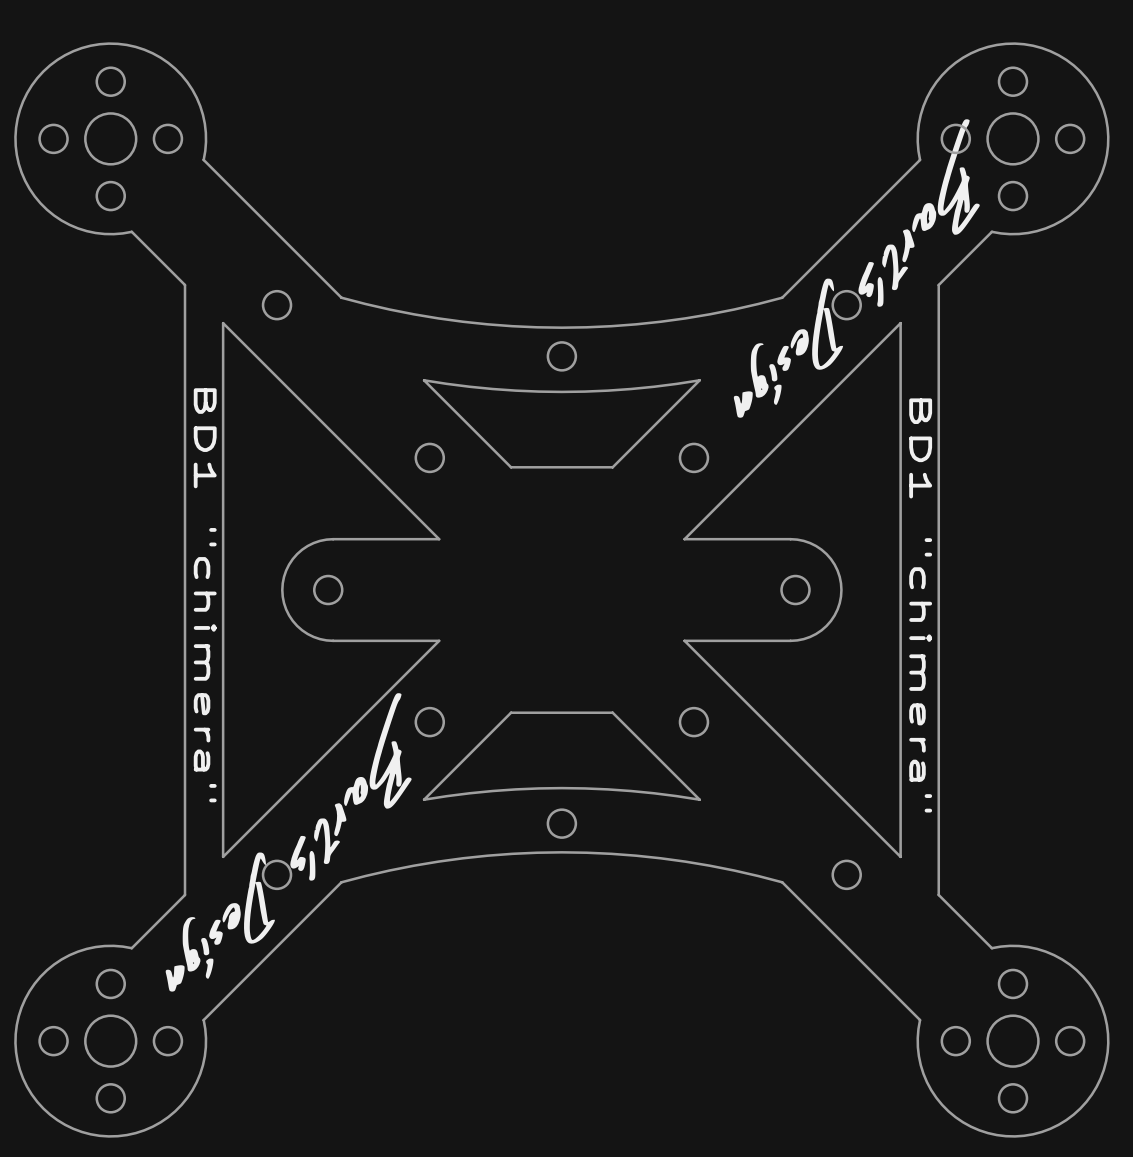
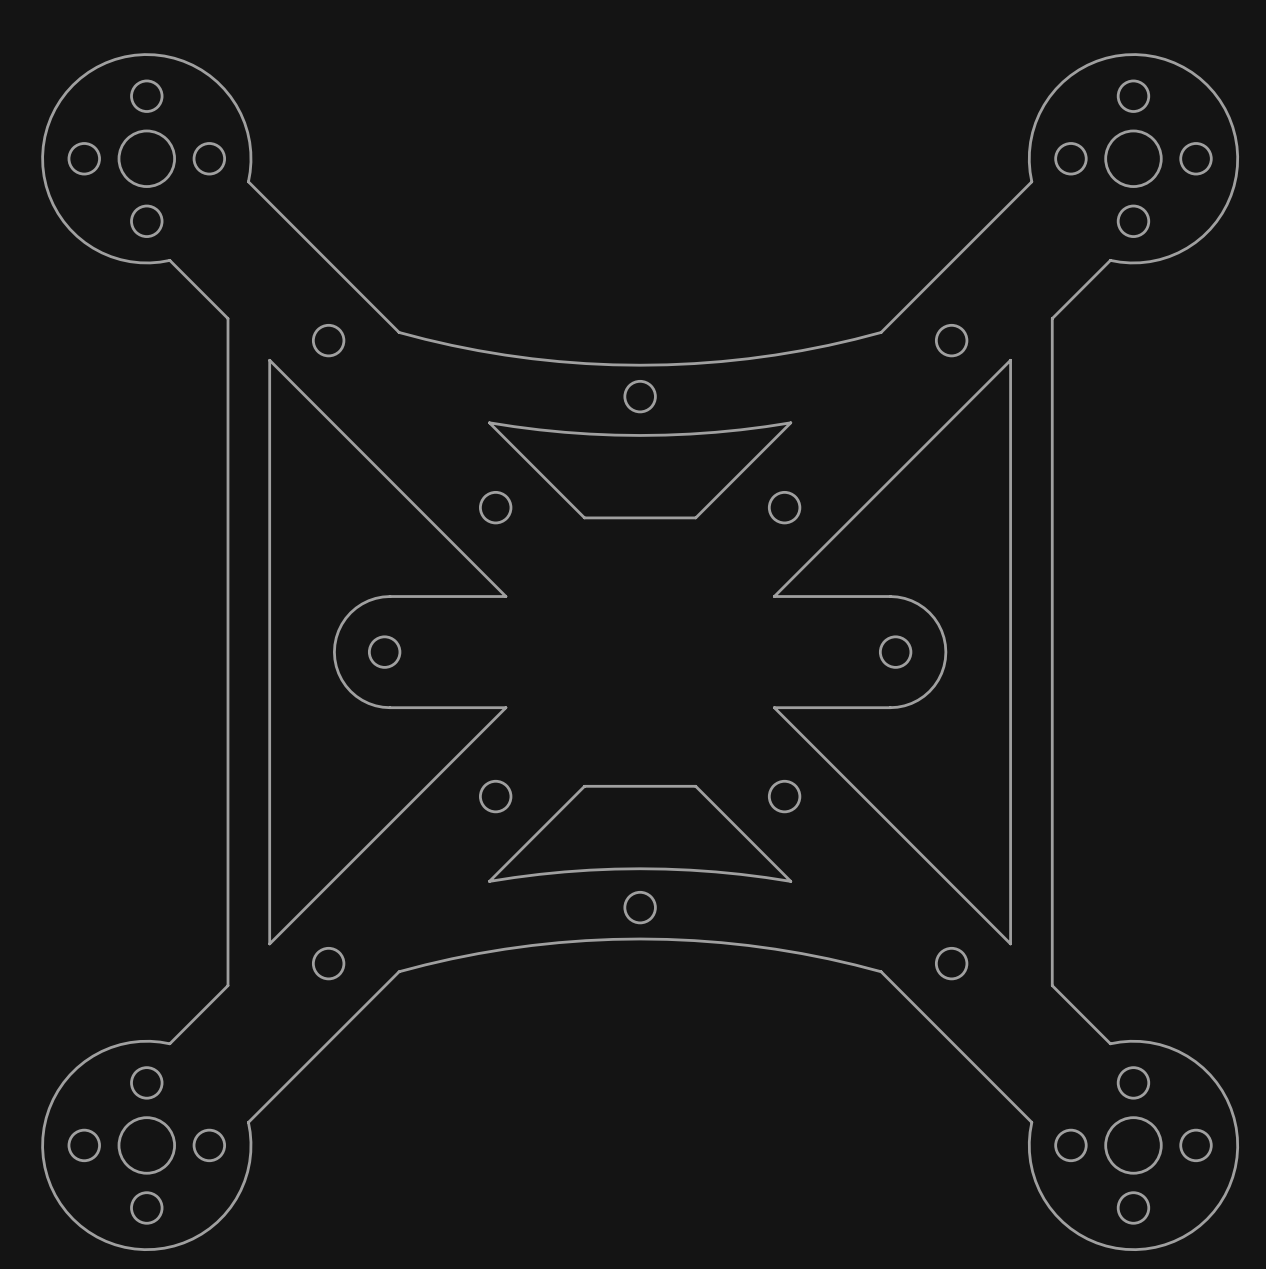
drawing: [733, 119, 980, 418] -> none
text: BD1 "chimera" (205, 595) -> none
text: BD1 "chimera" (920, 605) -> none
drawing: [165, 693, 412, 992] -> none

